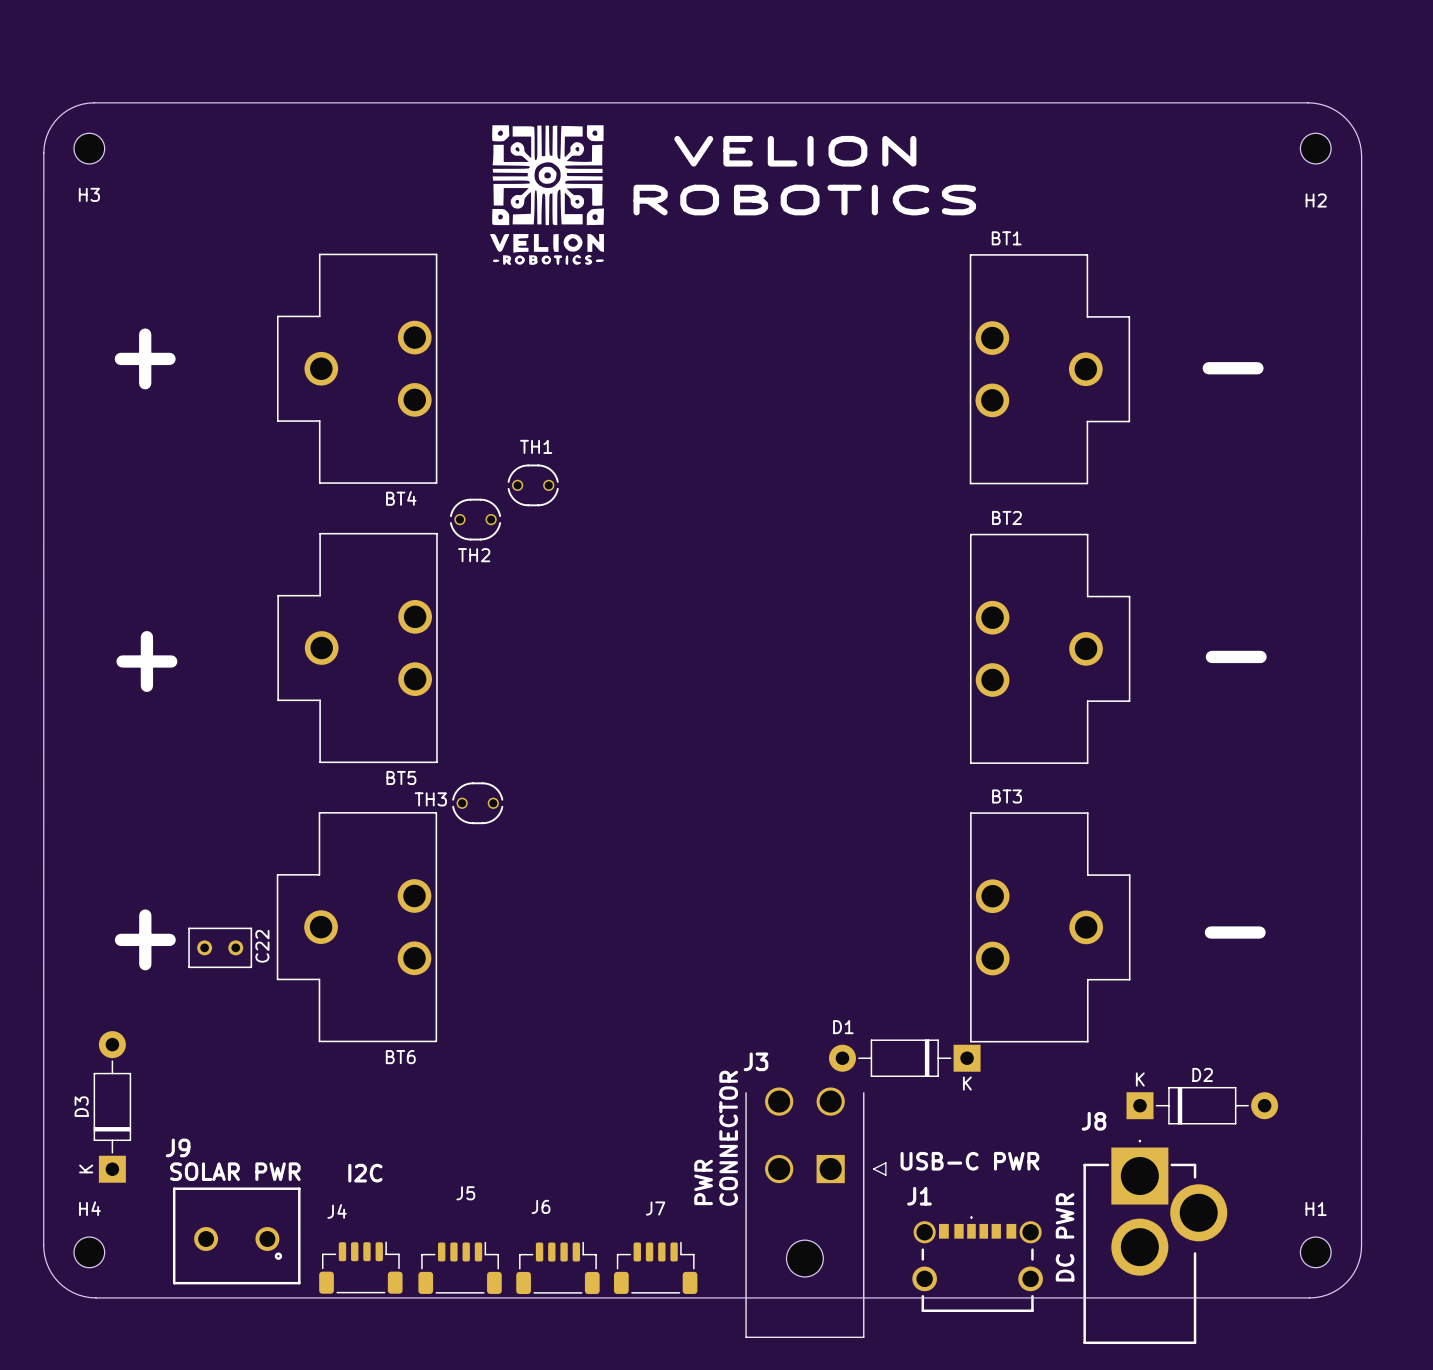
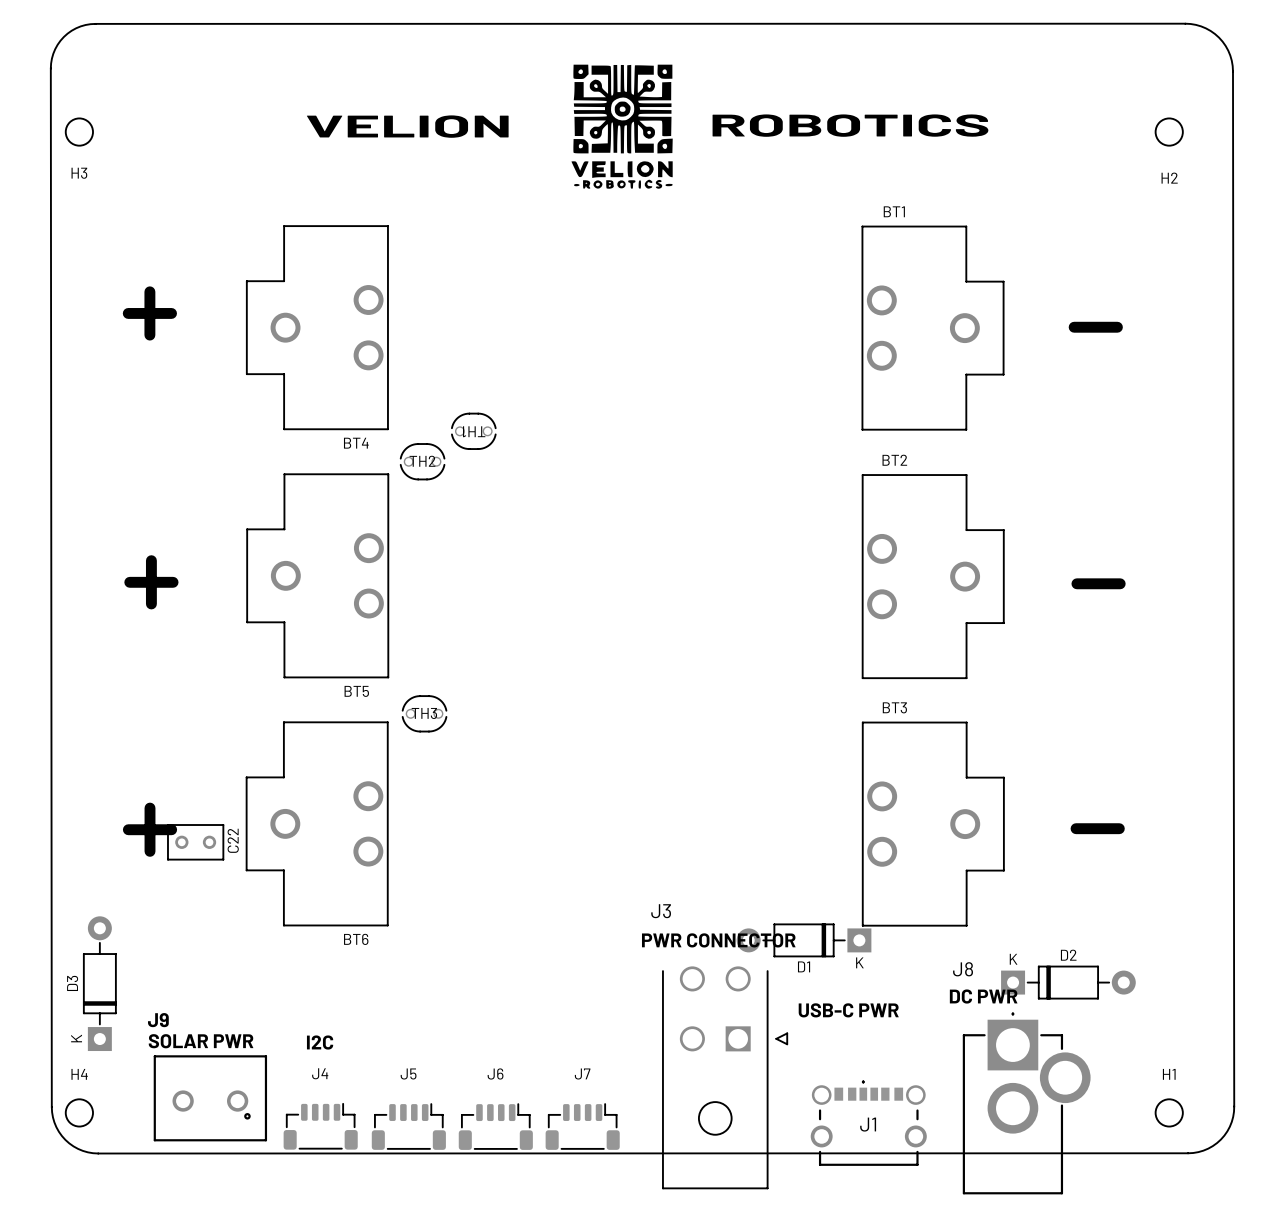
board edge: (94, 102) (1308, 102) (1331, 108) (1345, 118) (1356, 133) (1361, 156) (1361, 1245) (1356, 1268) (1346, 1282) (1326, 1294) (1309, 1297) (95, 1297) (73, 1292) (58, 1282) (46, 1262) (43, 1244) (43, 153) (48, 131) (58, 117) (72, 107) (94, 102) -> (1185, 23) (95, 23) (76, 28) (63, 36) (53, 53) (50, 68) (51, 1107) (54, 1122) (65, 1139) (78, 1148) (98, 1153) (1188, 1153) (1208, 1148) (1220, 1139) (1231, 1121) (1234, 1106) (1232, 71) (1228, 50) (1219, 37) (1206, 28) (1185, 23)
text: none -> VELION (407, 126)
text: VELION (795, 151) -> none
drawing position: (546, 195) -> (622, 126)
text position: ROBOTICS (804, 200) -> ROBOTICS (850, 125)
line: (145, 334) (145, 383) -> (149, 291) (149, 335)
line: (120, 358) (169, 358) -> (128, 313) (171, 313)
TH1 name rotation: 0° (536, 446) -> 180° (474, 431)
TH2 name position: TH2 (474, 555) -> TH2 (422, 461)
line: (146, 637) (146, 685) -> (151, 560) (151, 603)
line: (122, 661) (171, 661) -> (129, 582) (173, 582)
TH3 name position: TH3 (430, 799) -> TH3 (424, 713)
line: (145, 915) (145, 964) -> (150, 808) (150, 851)
line: (120, 939) (169, 939) -> (128, 829) (171, 829)
D1 name position: D1 (843, 1027) -> D1 (804, 966)
J3 name position: J3 (756, 1061) -> J3 (661, 911)
J8 name position: J8 (1094, 1121) -> J8 (963, 969)
text: CONNECTOR (728, 1138) -> PWR CONNECTOR (718, 940)
J8 footprint: [1083, 1139, 1228, 1345] -> [962, 1012, 1091, 1195]
text position: USB-C PWR (969, 1161) -> USB-C PWR (848, 1010)
text: PWR (703, 1182) -> none
J5 name position: J5 (465, 1193) -> J5 (408, 1073)
J1 name position: J1 (919, 1196) -> J1 (868, 1124)
J6 name position: J6 (540, 1206) -> J6 (495, 1073)
J4 name position: J4 (337, 1211) -> J4 (320, 1073)
text rotation: 0° (1065, 1237) -> 90° clockwise (983, 996)
text position: DC PWR (1065, 1237) -> DC PWR (983, 996)

